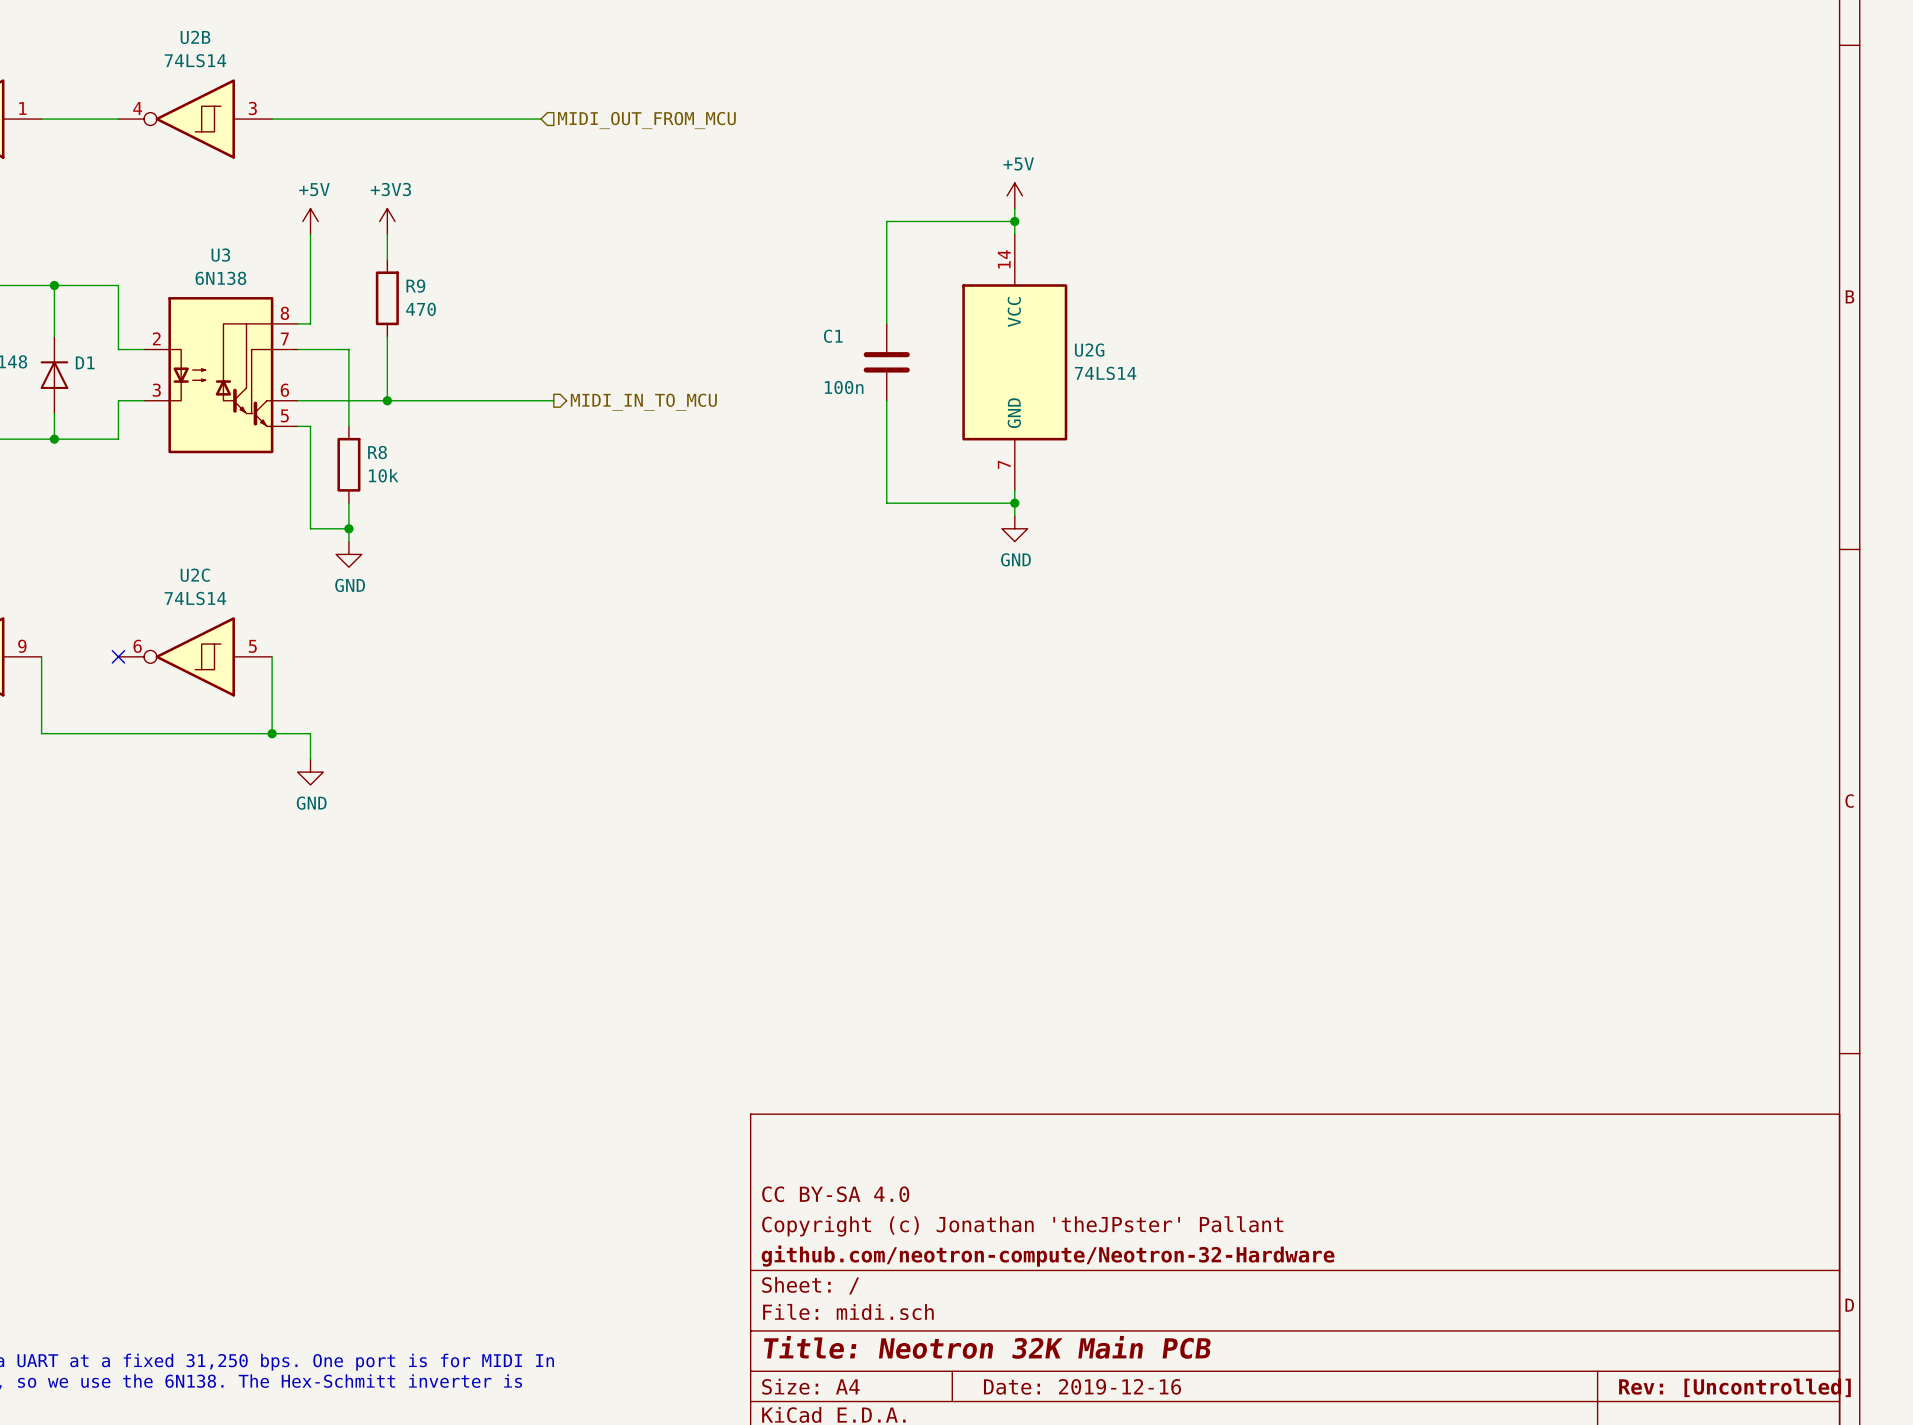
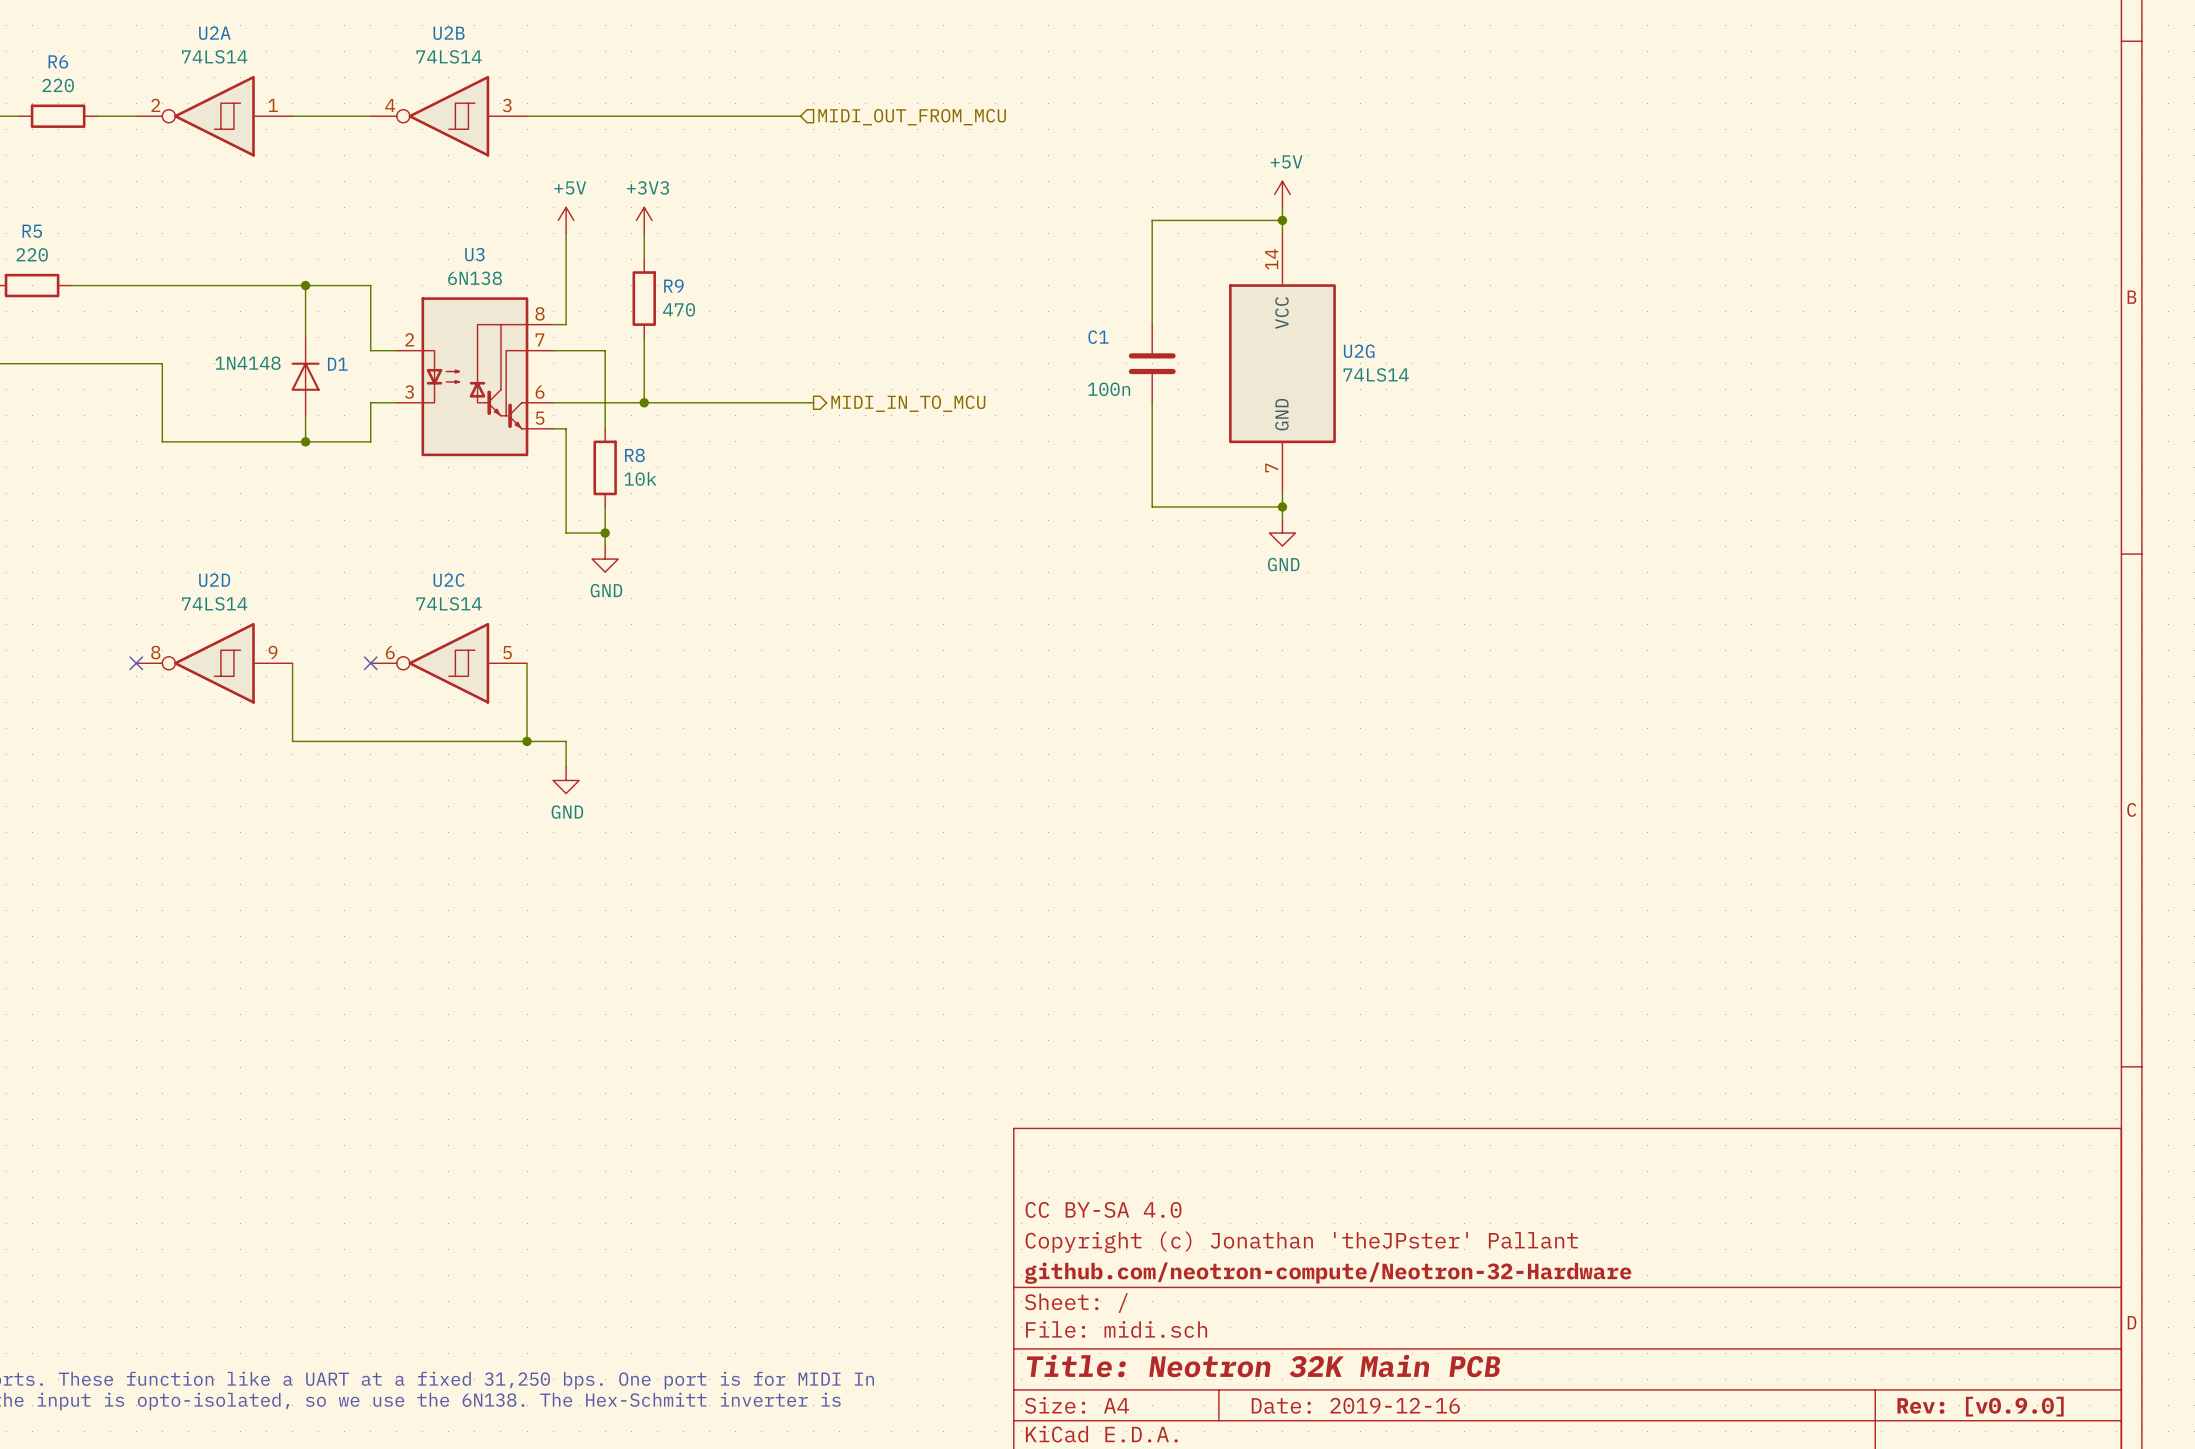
title block: Rev: [Uncontrolled] (1734, 1387) -> Rev: [v0.9.0] (1980, 1406)

